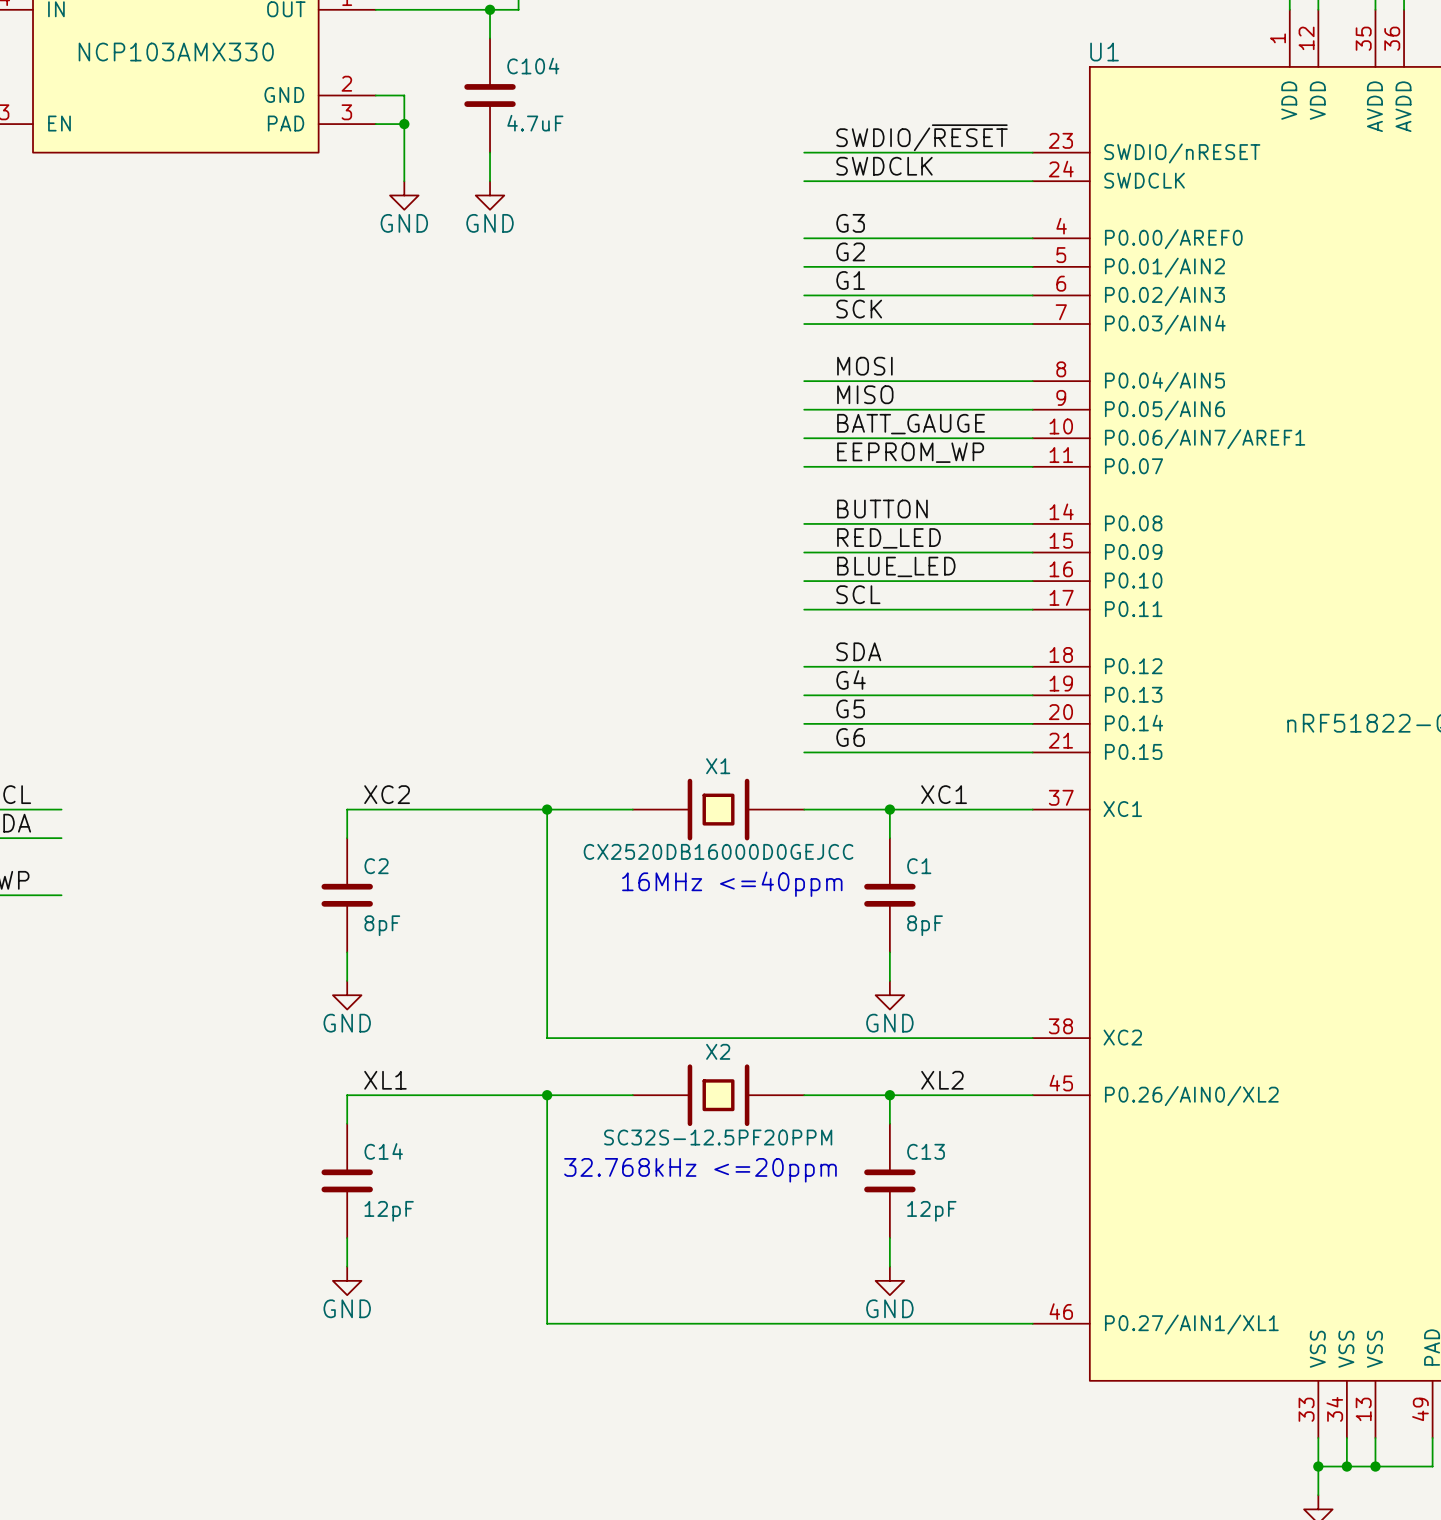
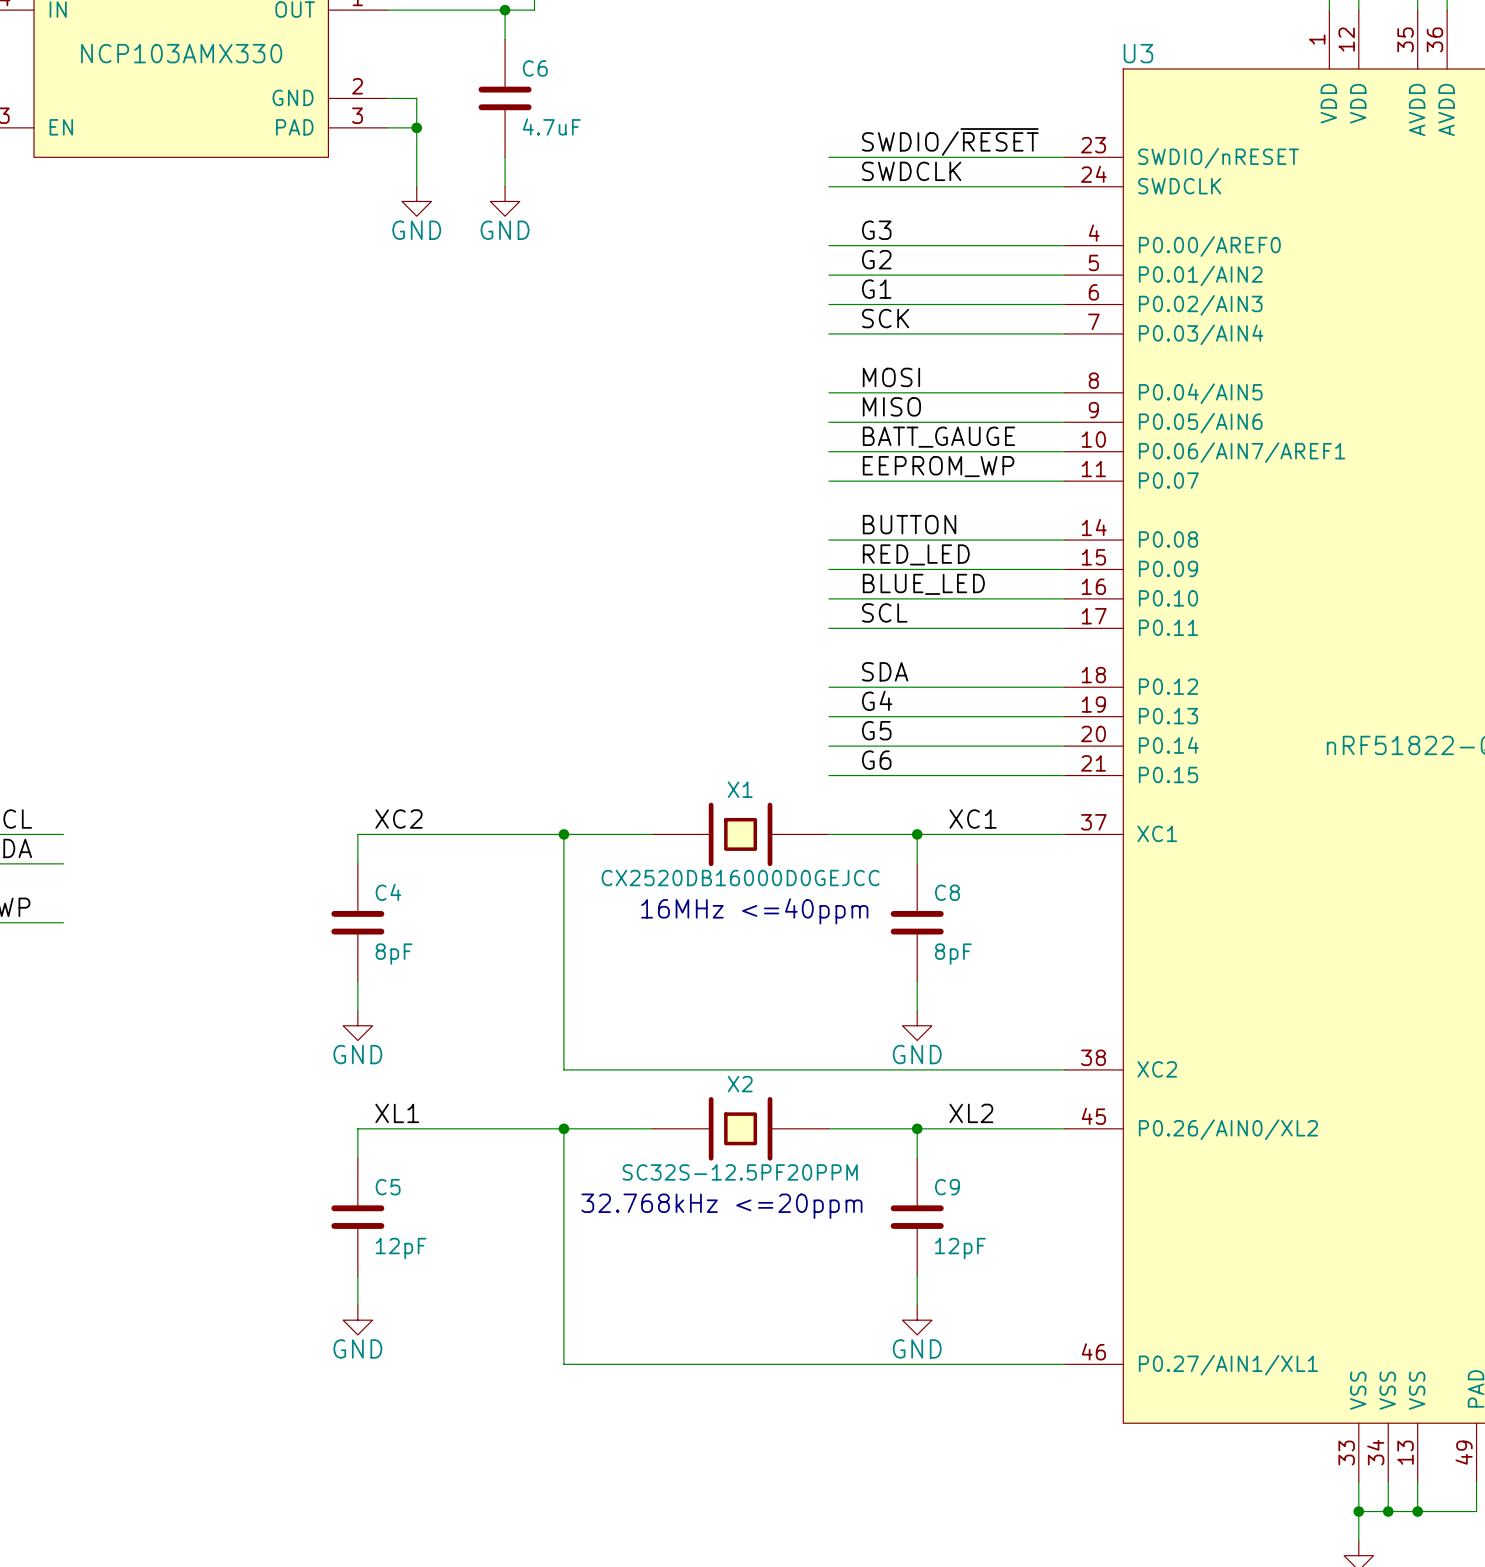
U1 name: U1 (1104, 52) -> U3 (1138, 53)
C104 name: C104 (533, 66) -> C6 (535, 68)
C2 name: C2 (376, 866) -> C4 (388, 892)
C1 name: C1 (919, 866) -> C8 (947, 892)
C14 name: C14 (383, 1151) -> C5 (388, 1187)
C13 name: C13 (926, 1151) -> C9 (947, 1187)

